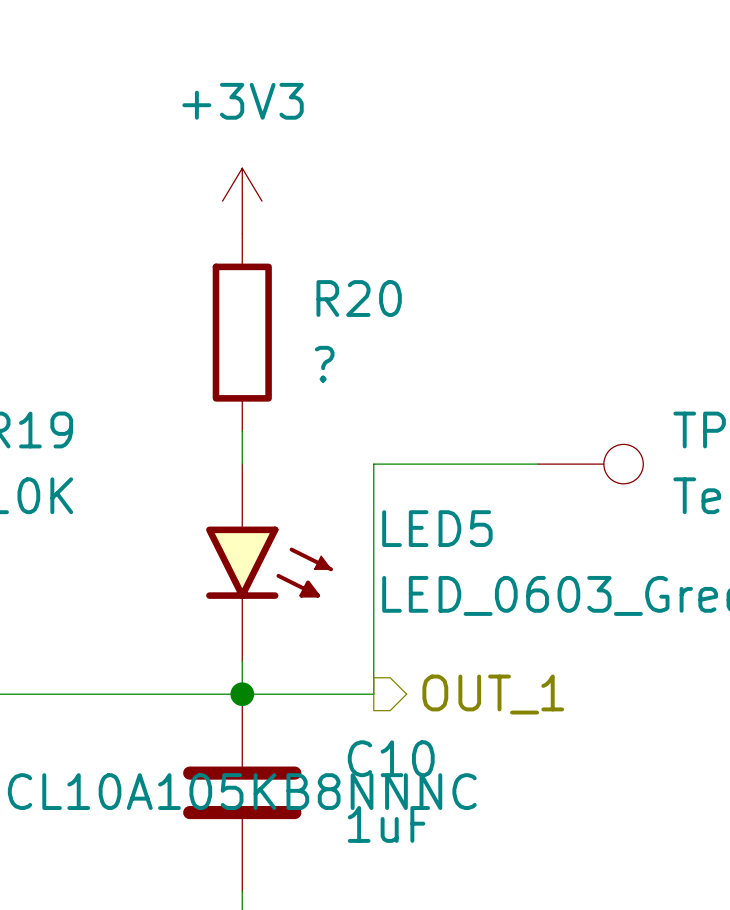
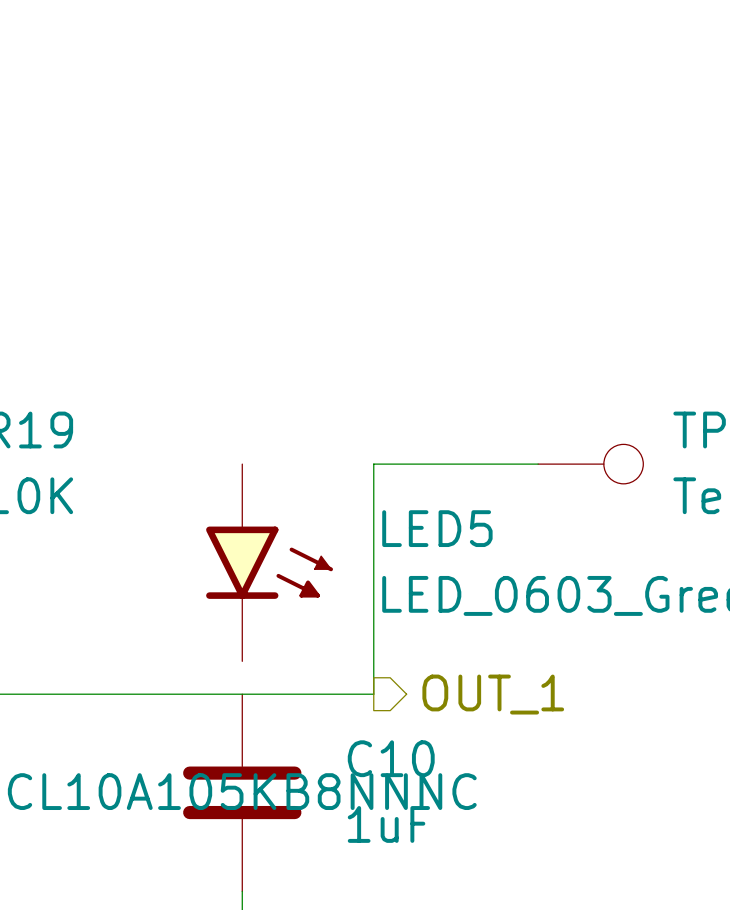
power symbol: +3V3 (242, 201) -> none
R20: ? (242, 332) -> none
wire: (242, 431) (242, 464) -> none
wire: (242, 661) (242, 694) -> none
junction: (242, 694) -> none

